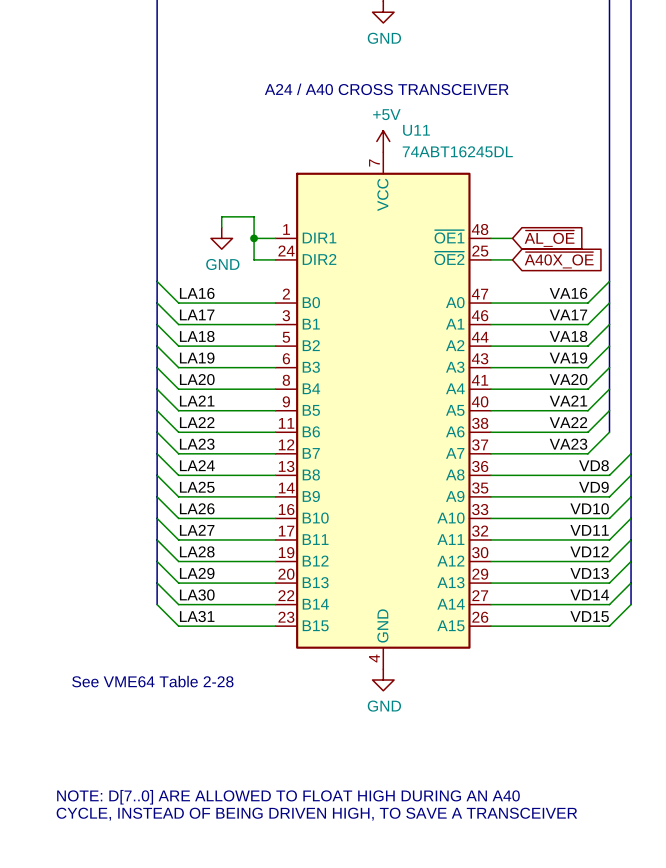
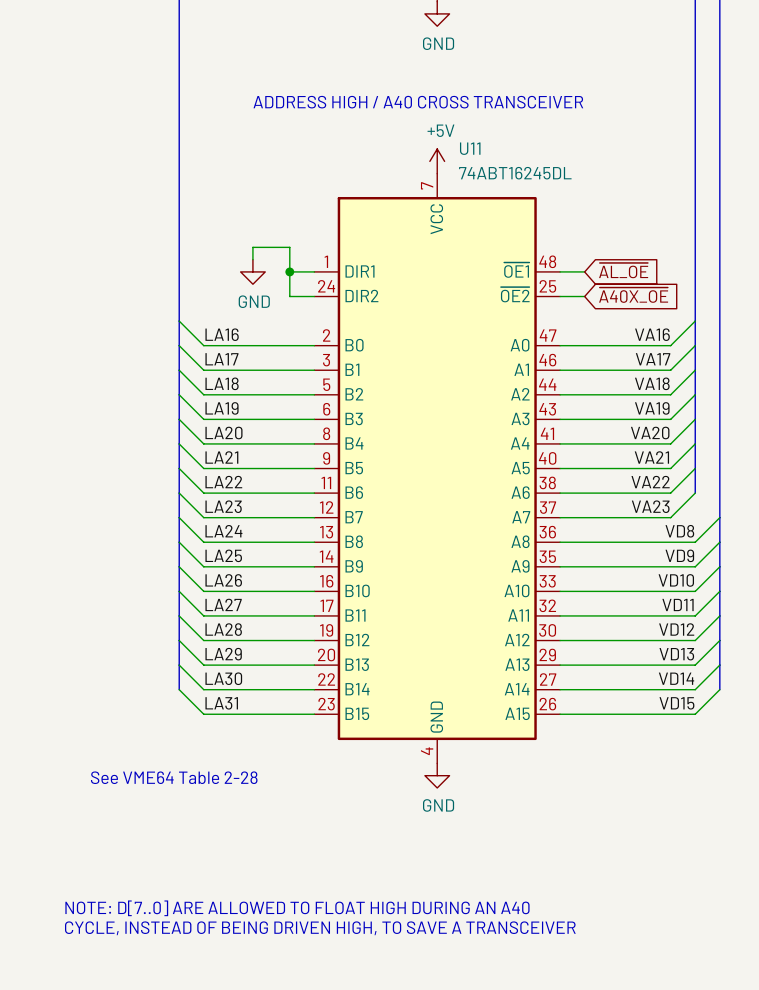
text: A24 / A40 CROSS TRANSCEIVER (386, 89) -> ADDRESS HIGH / A40 CROSS TRANSCEIVER (418, 102)

